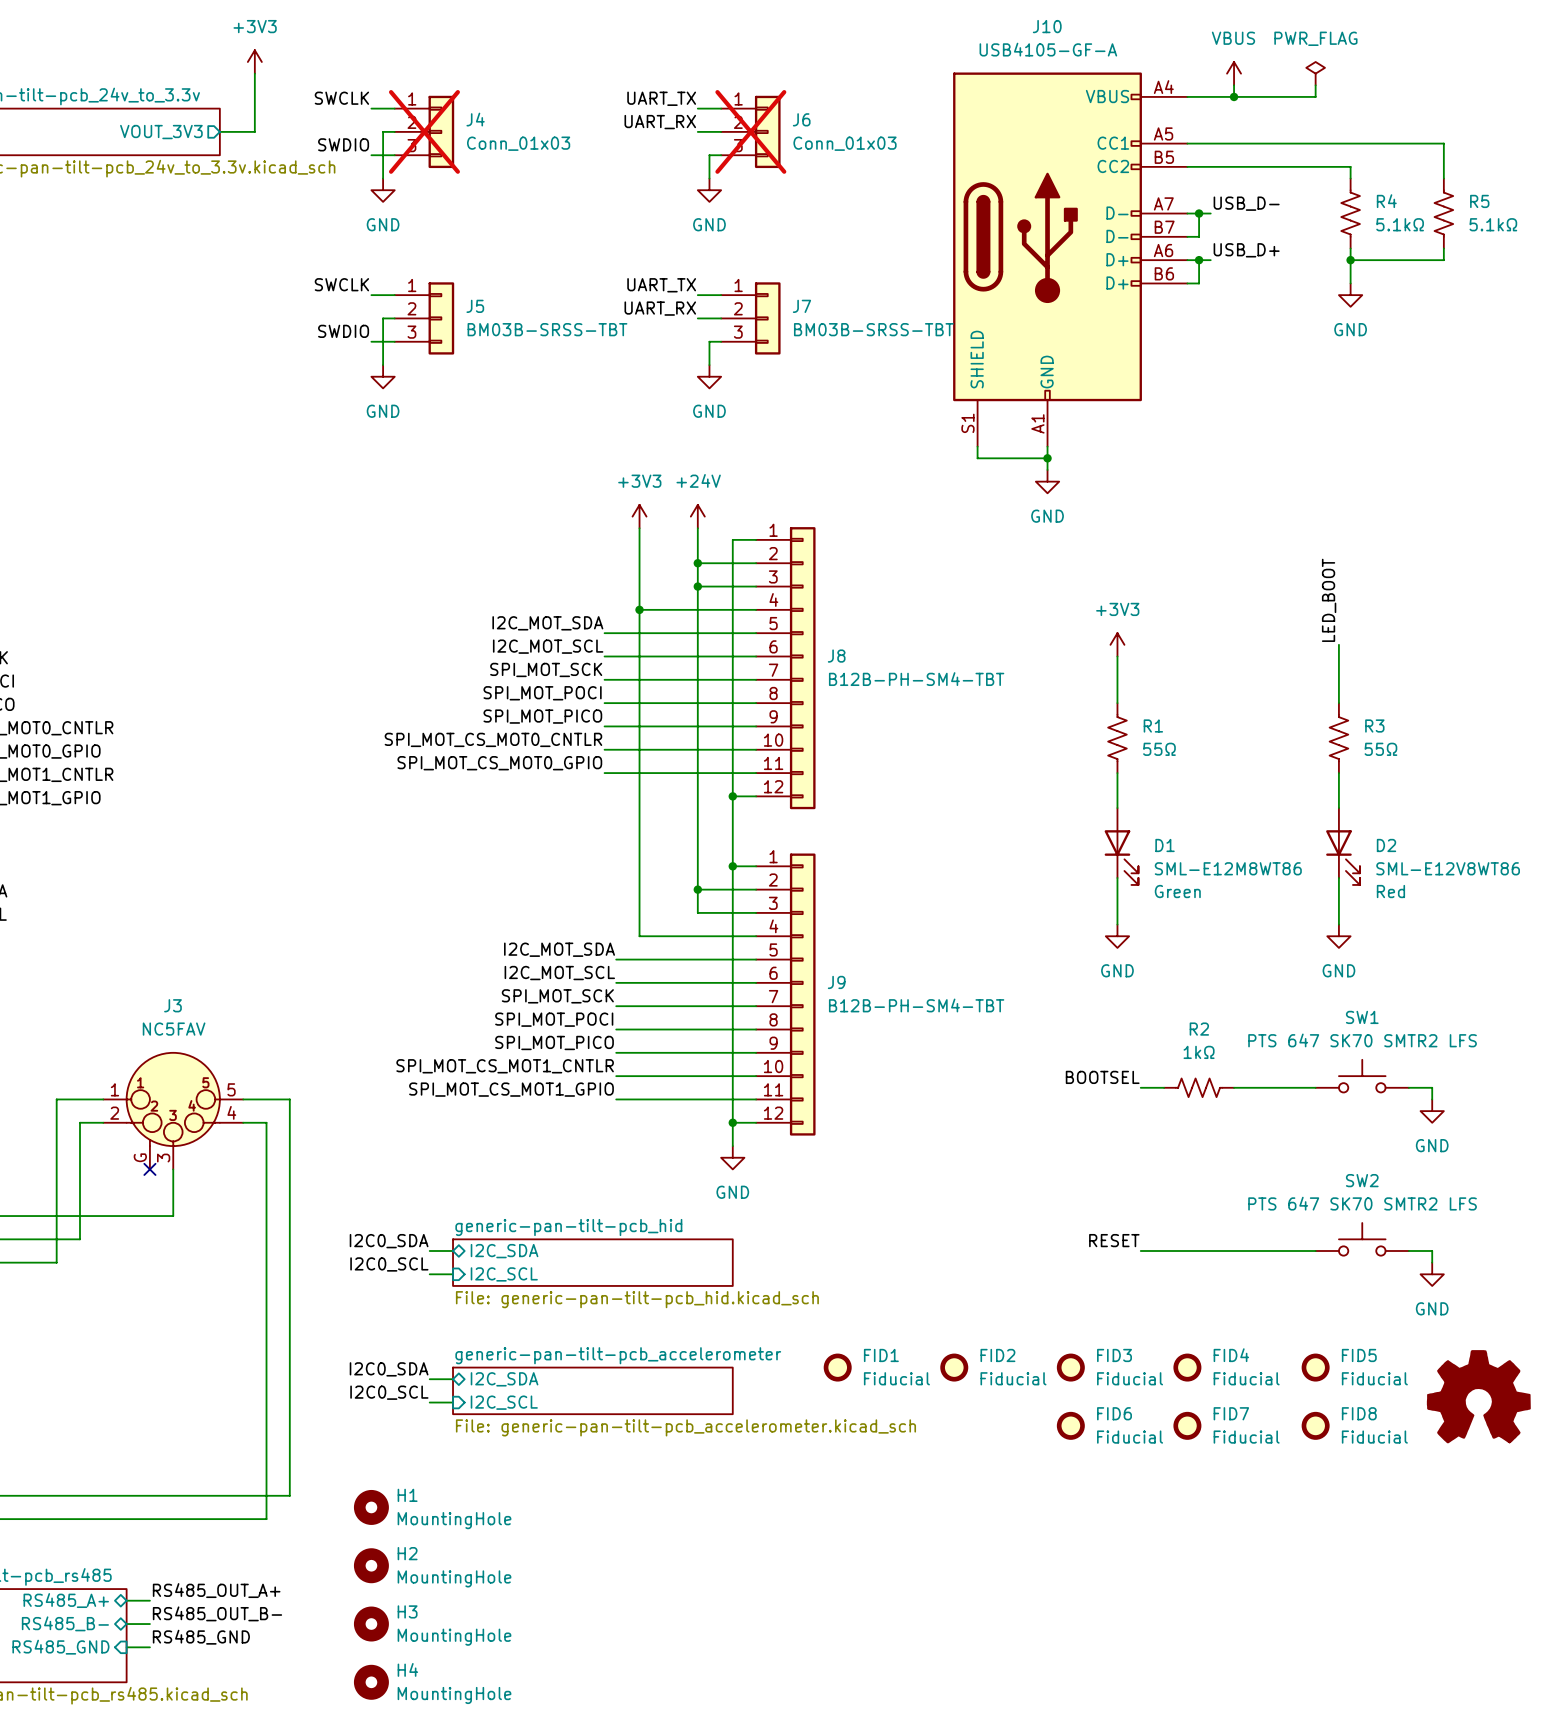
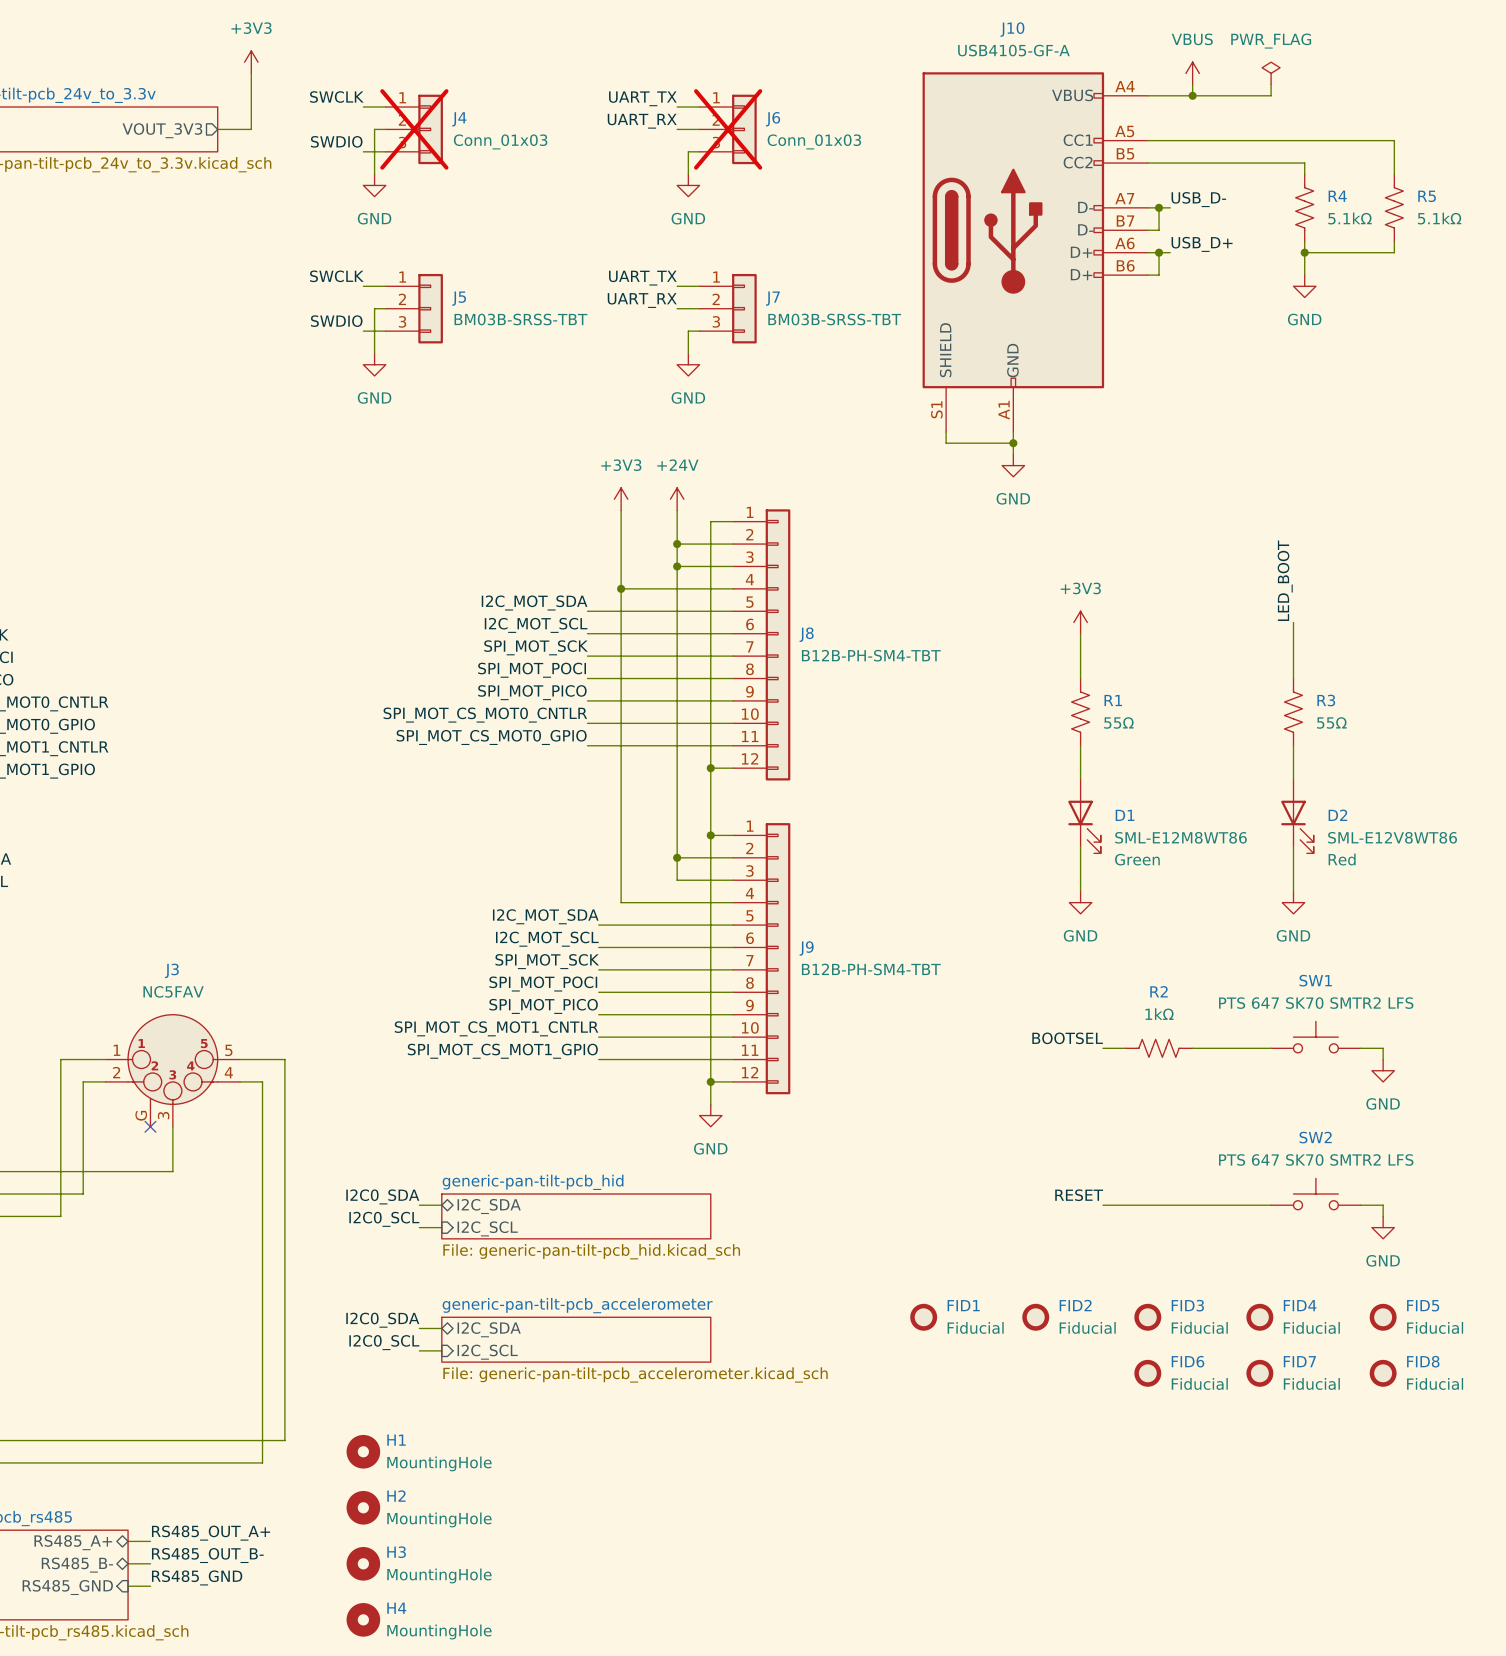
FID2 name: FID2 (997, 1355) -> FID1 (963, 1305)
FID3 name: FID3 (1114, 1355) -> FID2 (1075, 1305)
FID4 name: FID4 (1231, 1355) -> FID3 (1187, 1305)
FID1: Fiducial (837, 1367) -> none
FID4: none -> Fiducial (1259, 1317)
FID5 position: (1315, 1367) -> (1383, 1317)
part: (1478, 1396) -> none
FID7 name: FID7 (1231, 1413) -> FID6 (1187, 1361)
FID6: Fiducial (1070, 1425) -> none
FID7: none -> Fiducial (1259, 1373)
FID8 position: (1315, 1425) -> (1383, 1373)

